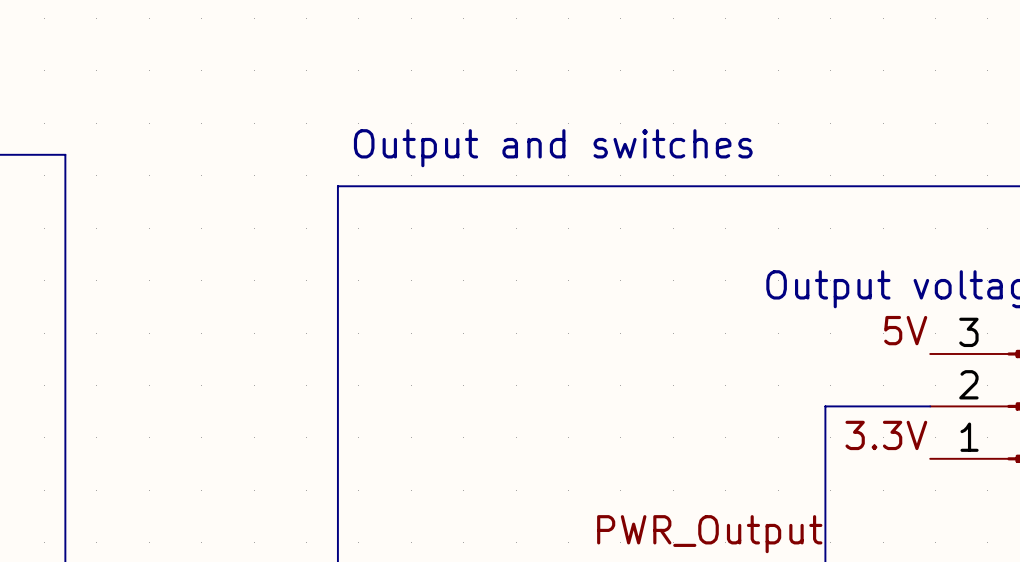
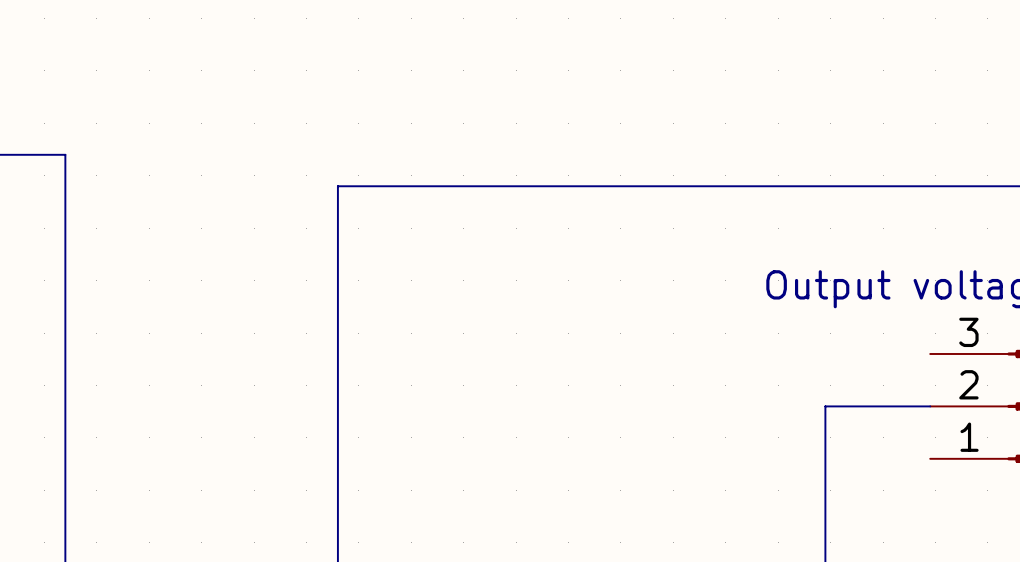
text: Output and switches (553, 148) -> none
label: 5V (905, 330) -> none
label: 3.3V (886, 435) -> none
label: PWR_Output (709, 534) -> none

